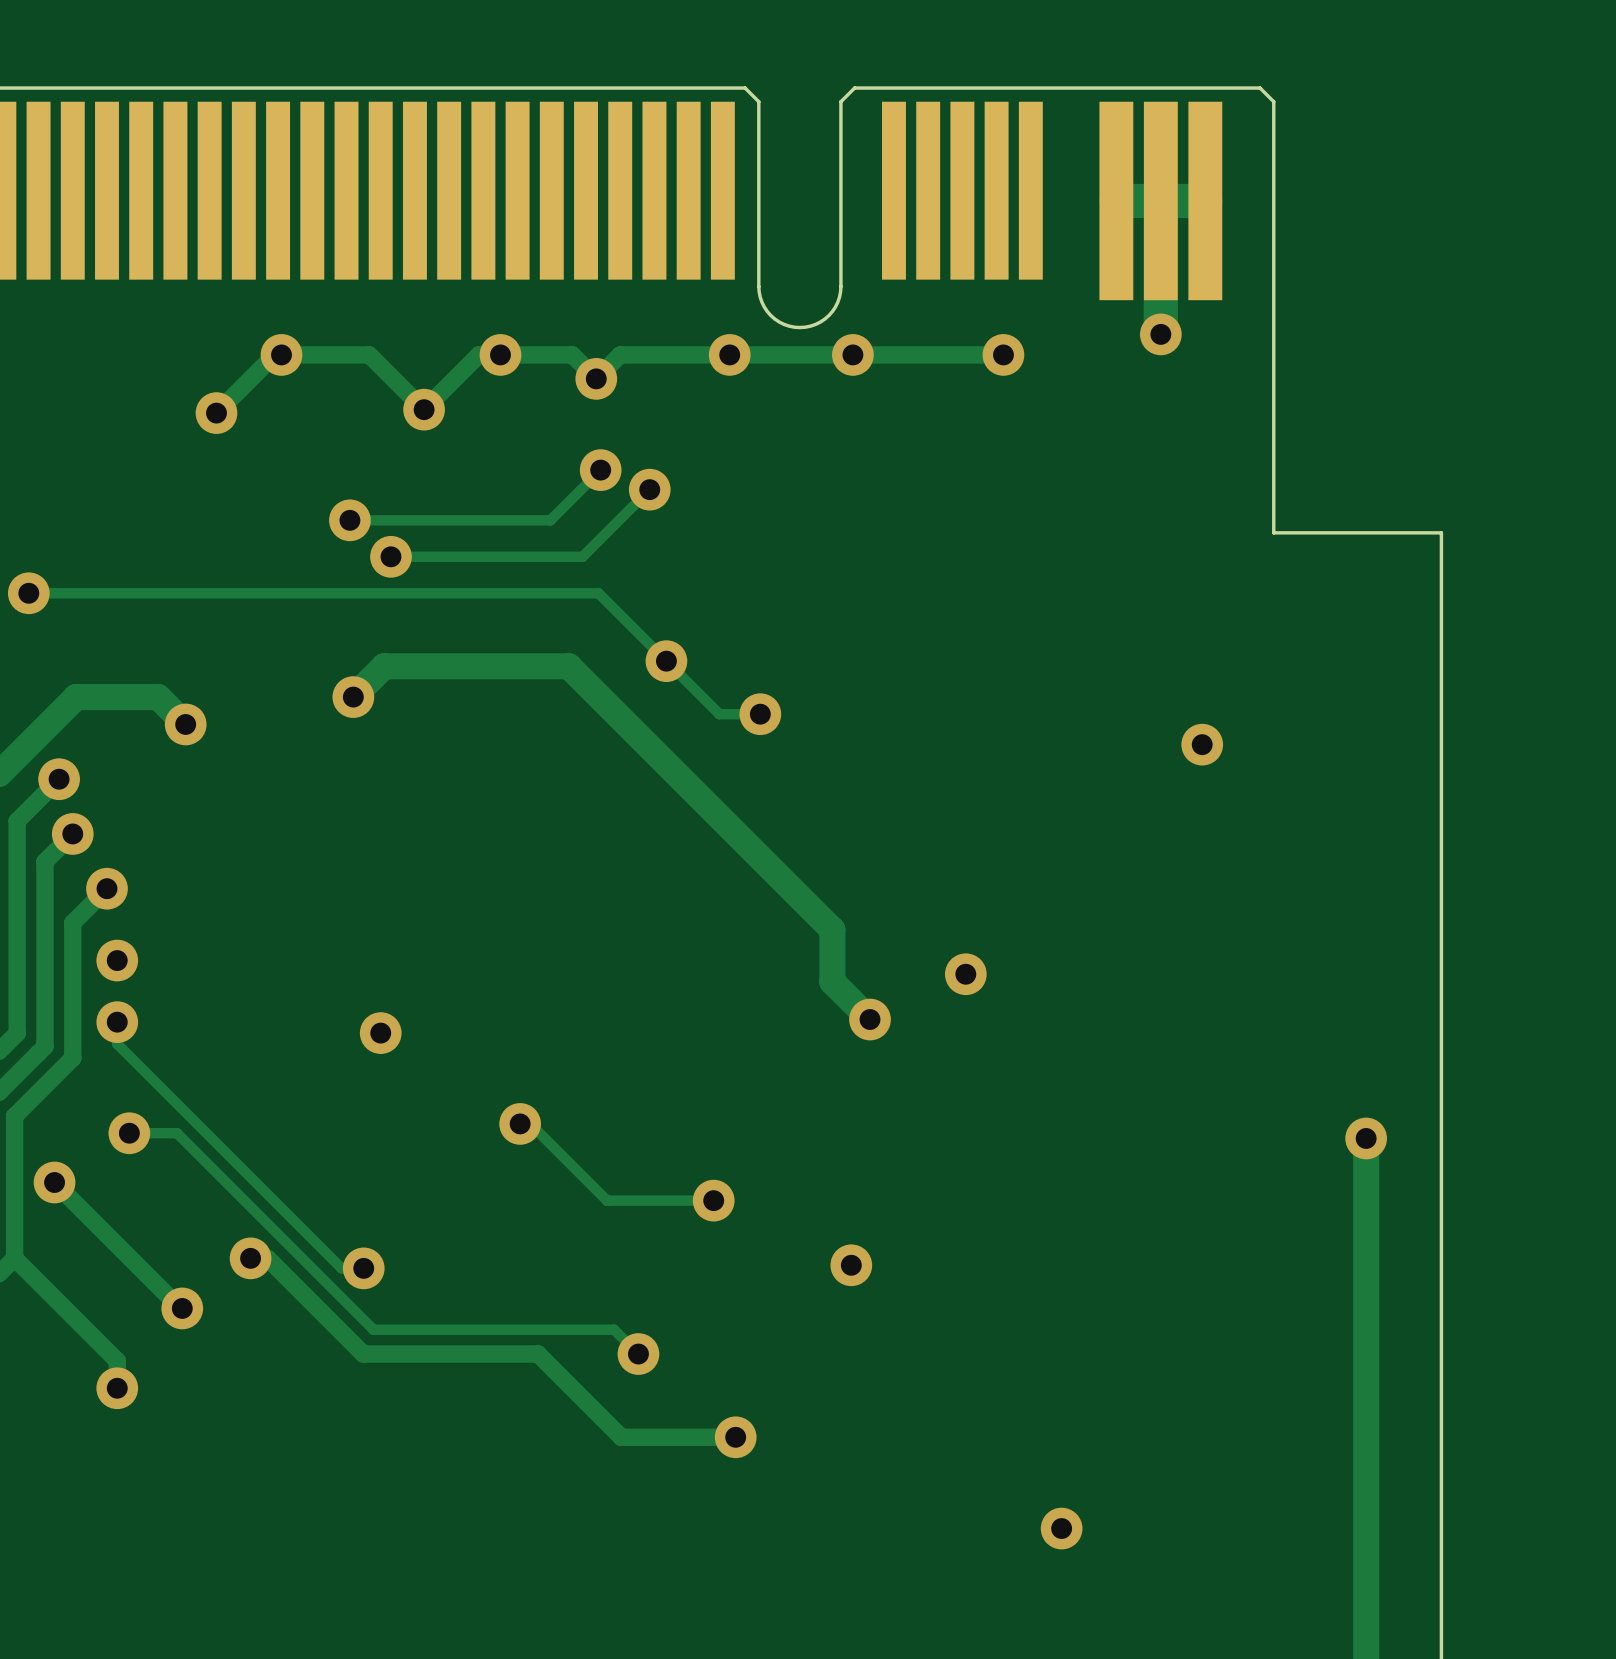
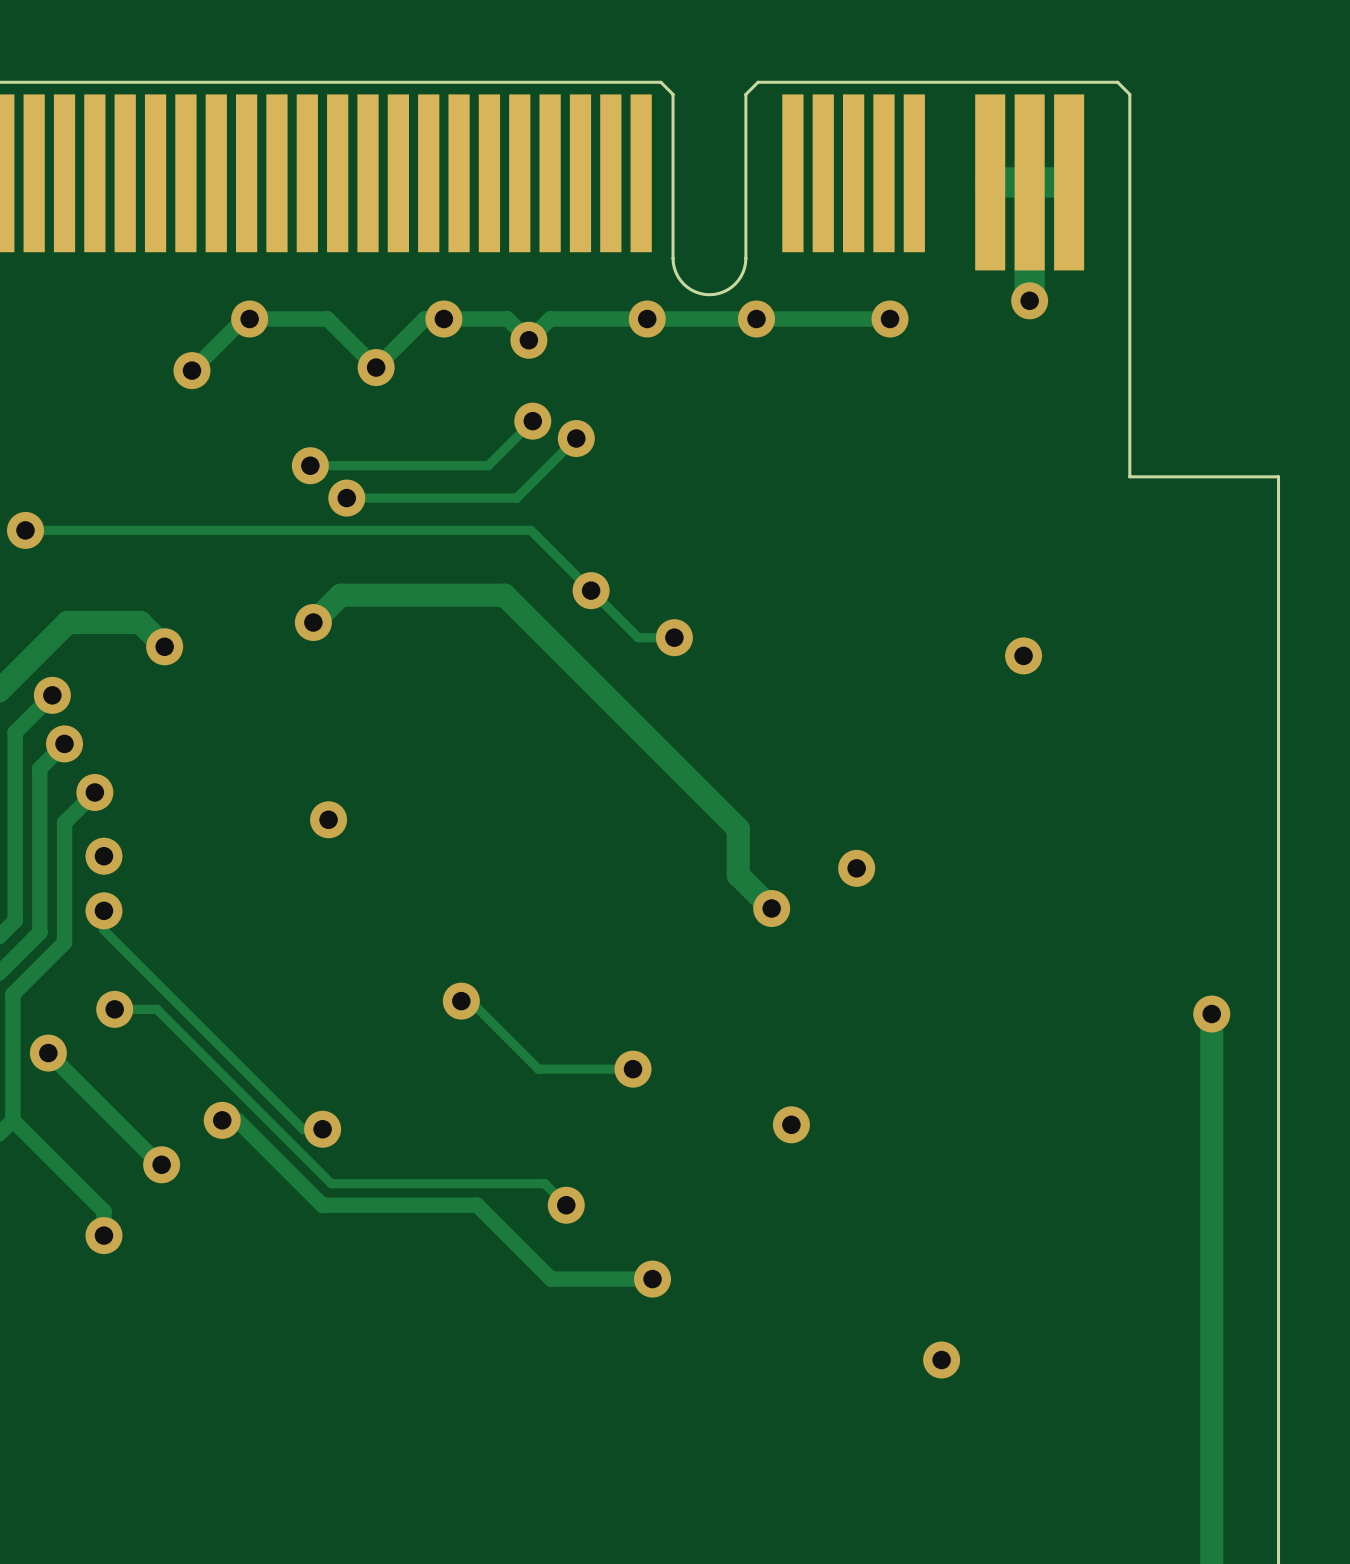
via position: (1202, 744) -> (1023, 655)
via position: (380, 1033) -> (328, 819)
via position: (851, 1265) -> (791, 1124)

